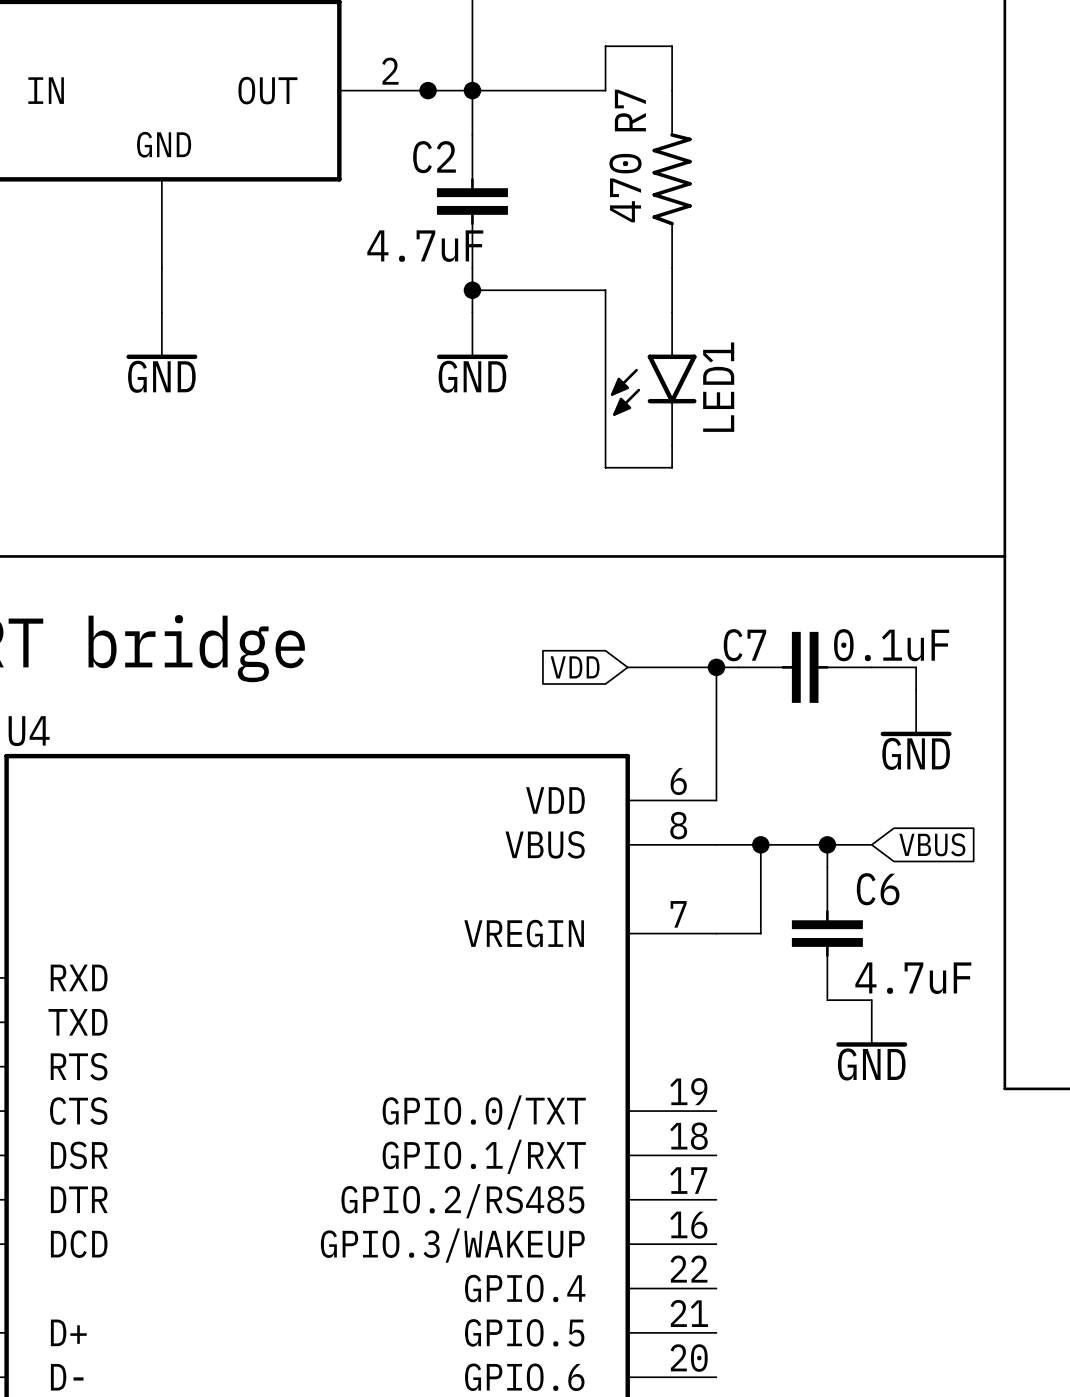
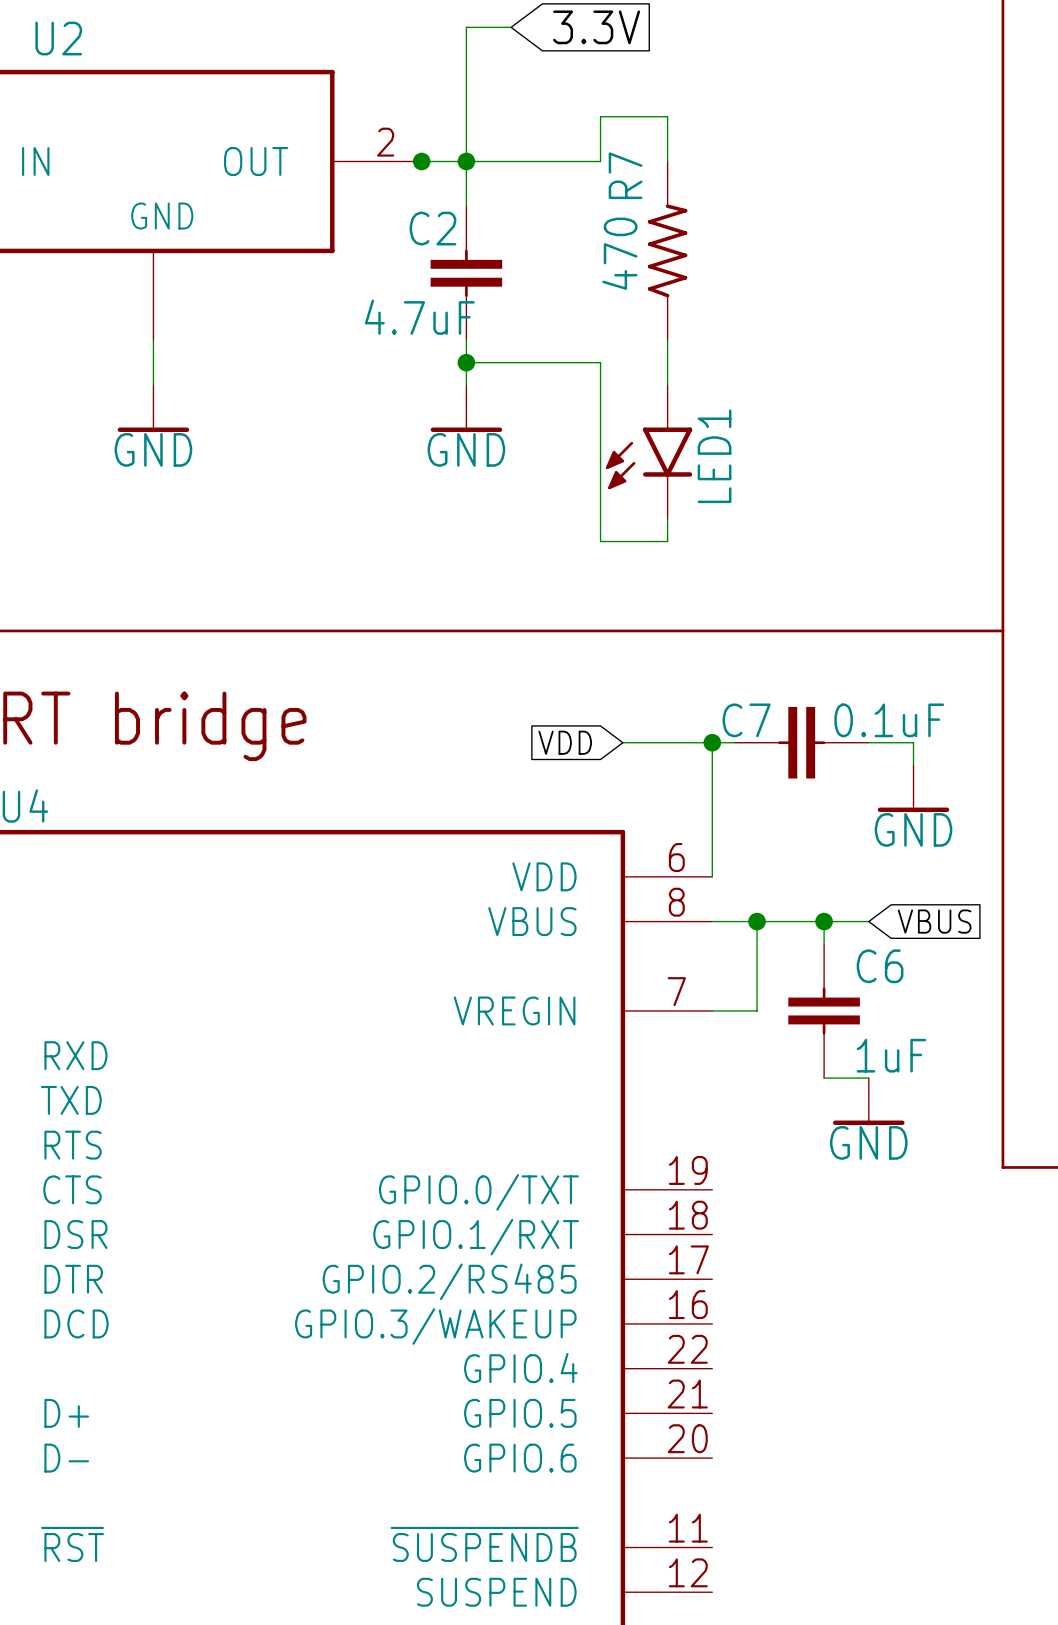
C6 value: 4.7uF (913, 978) -> 1uF (891, 1055)

